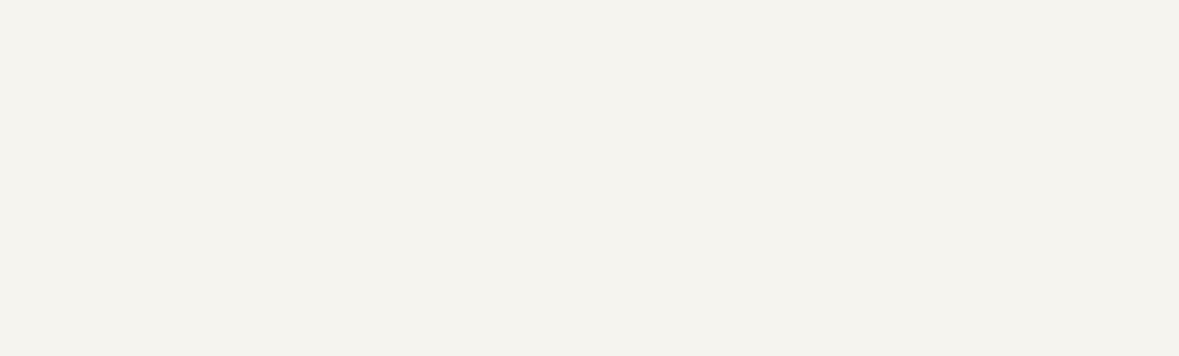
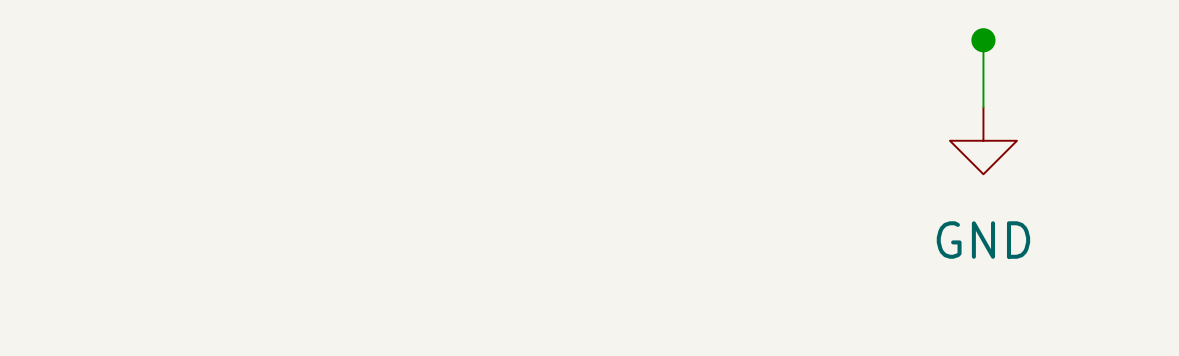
wire: none -> (983, 40) (983, 107)
junction: none -> (983, 40)
power symbol: none -> GND (983, 140)

